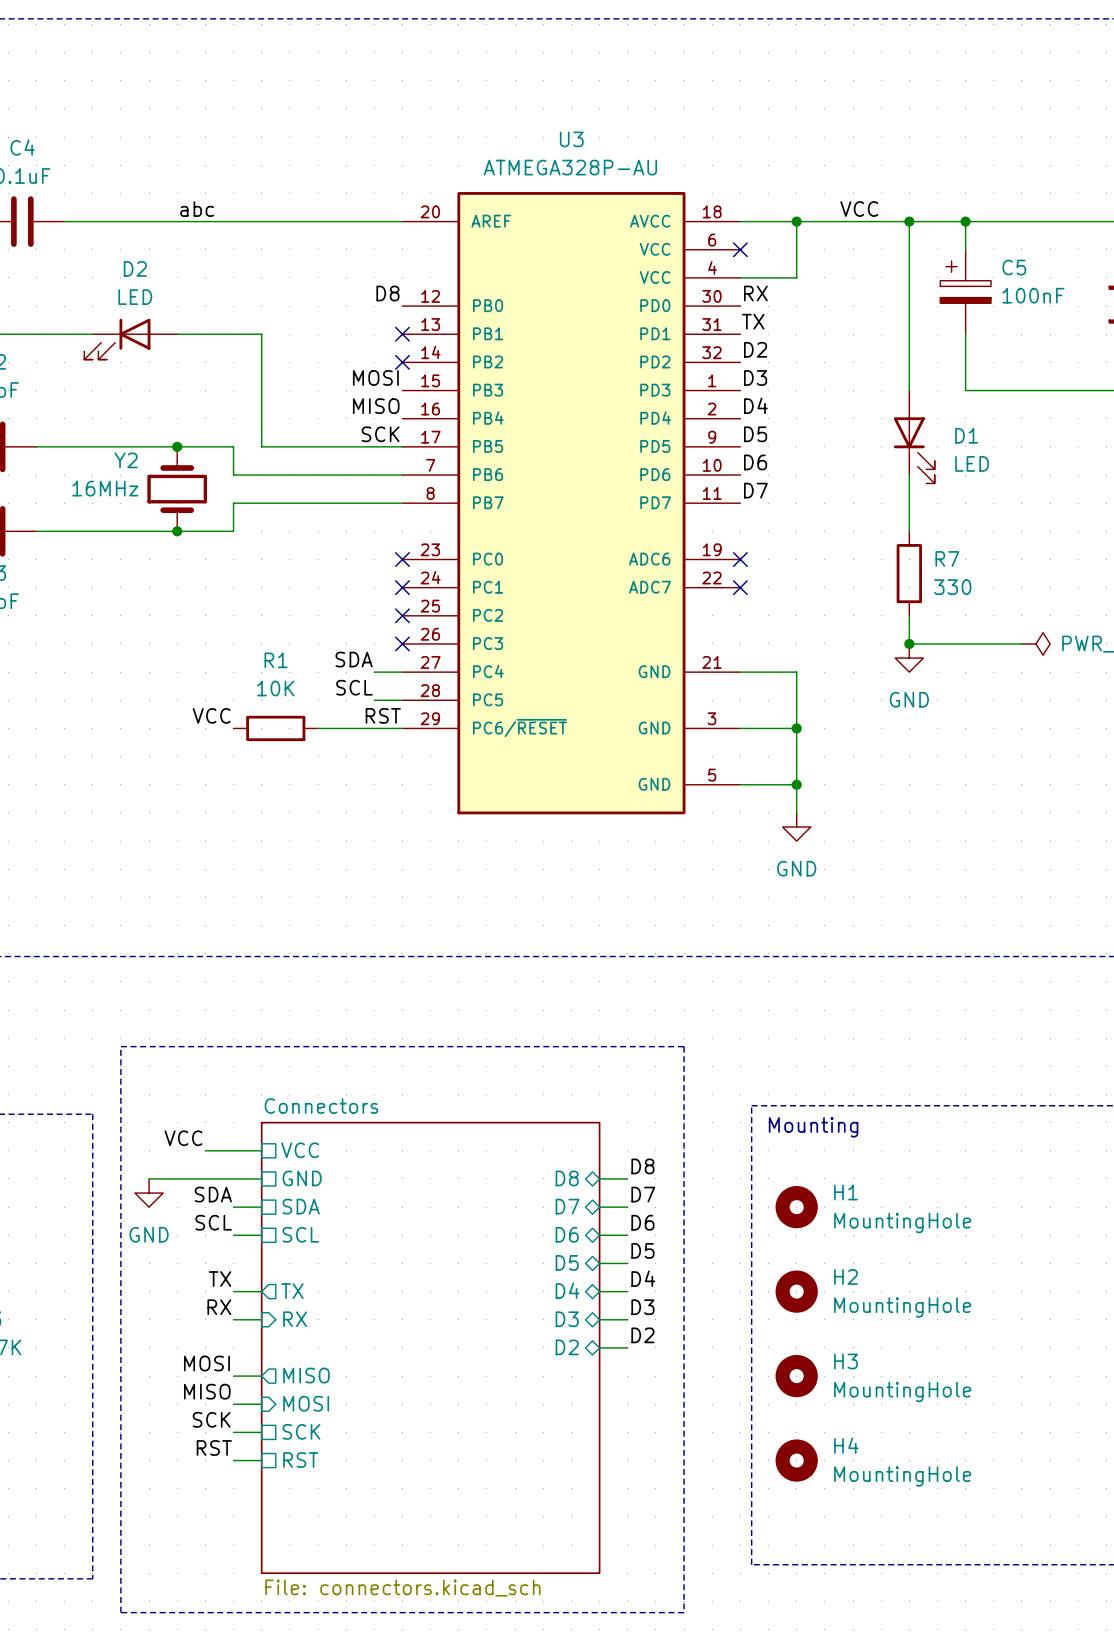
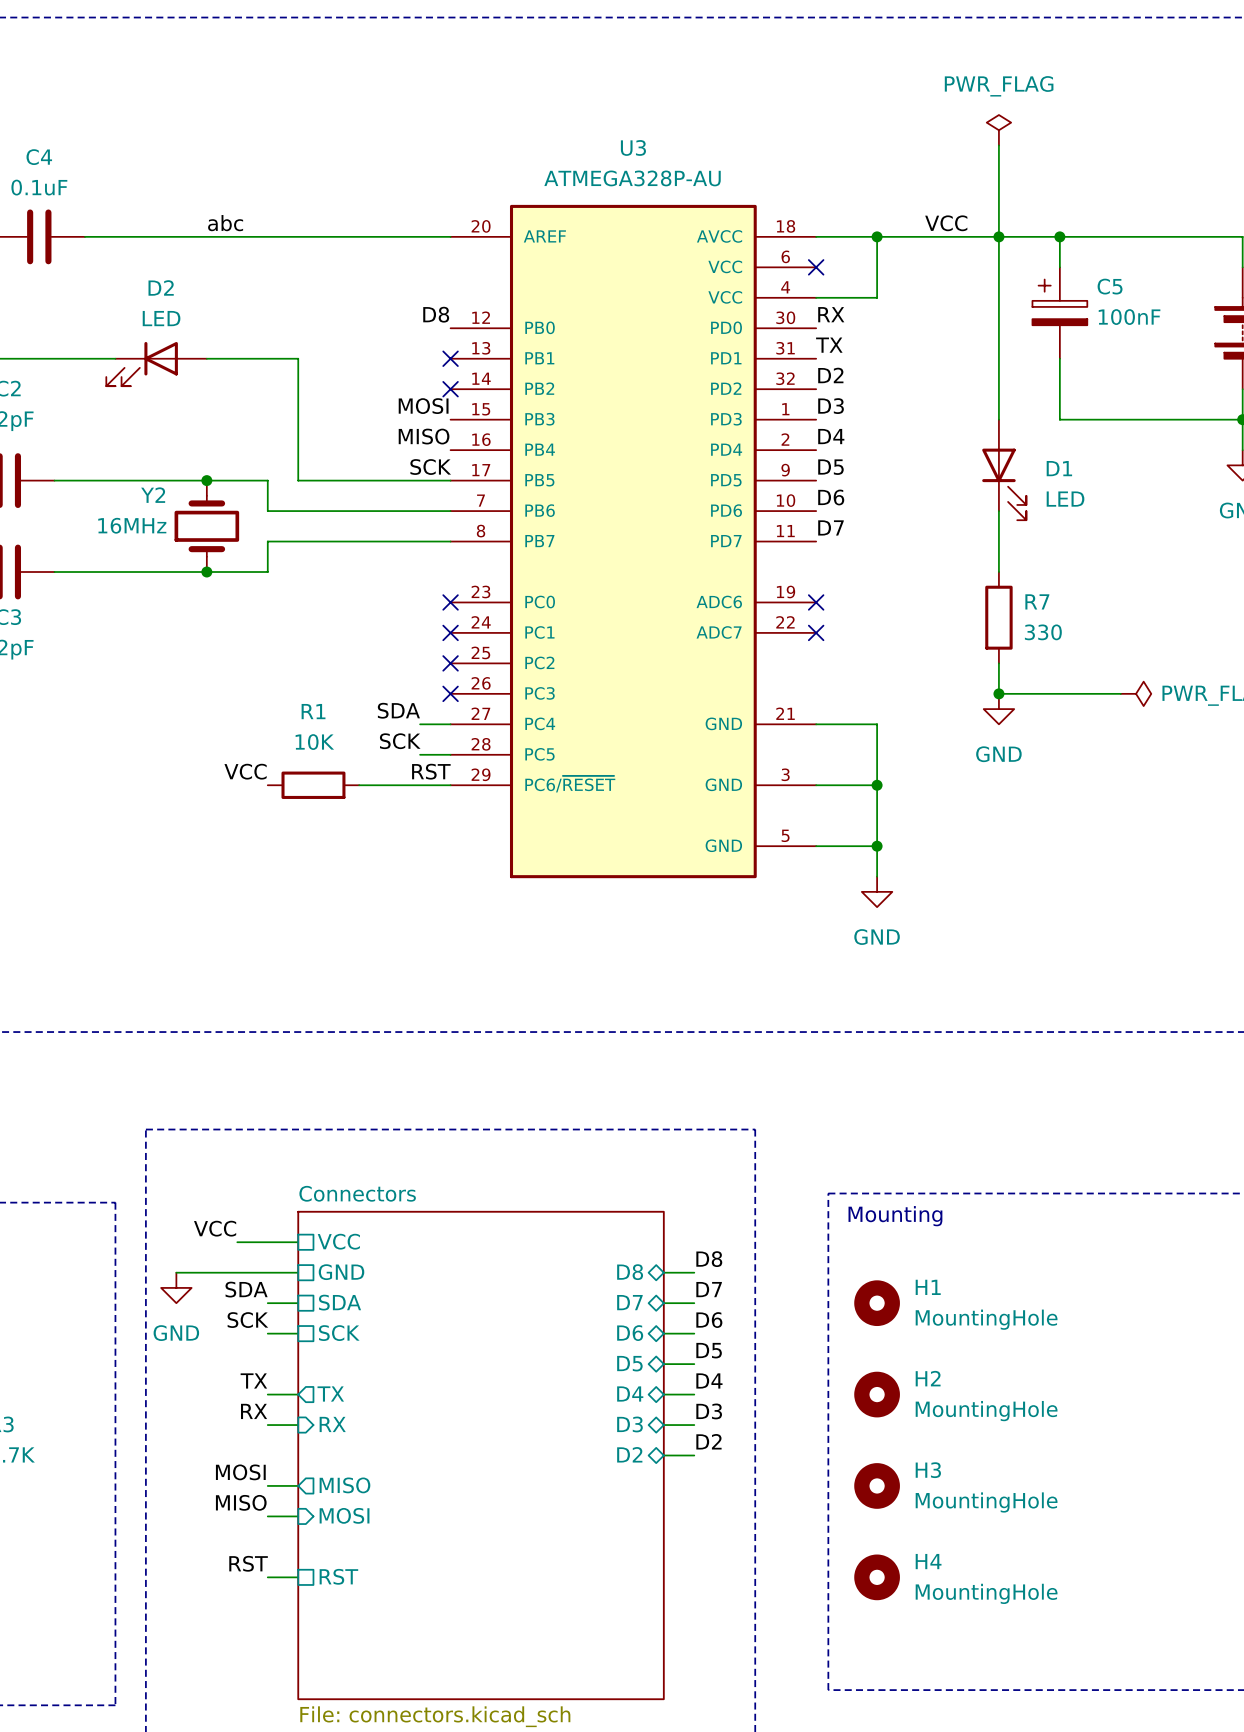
power symbol: none -> PWR_FLAG (998, 130)
wire: none -> (998, 145) (998, 236)
label: SCL (354, 687) -> SCK (400, 741)
label: SCL (213, 1222) -> SCK (247, 1320)
sheet pin: SCL (300, 1234) -> SCK (339, 1333)
label: SCK (211, 1419) -> none
sheet pin: SCK (301, 1431) -> none
wire: (233, 1432) (261, 1432) -> none

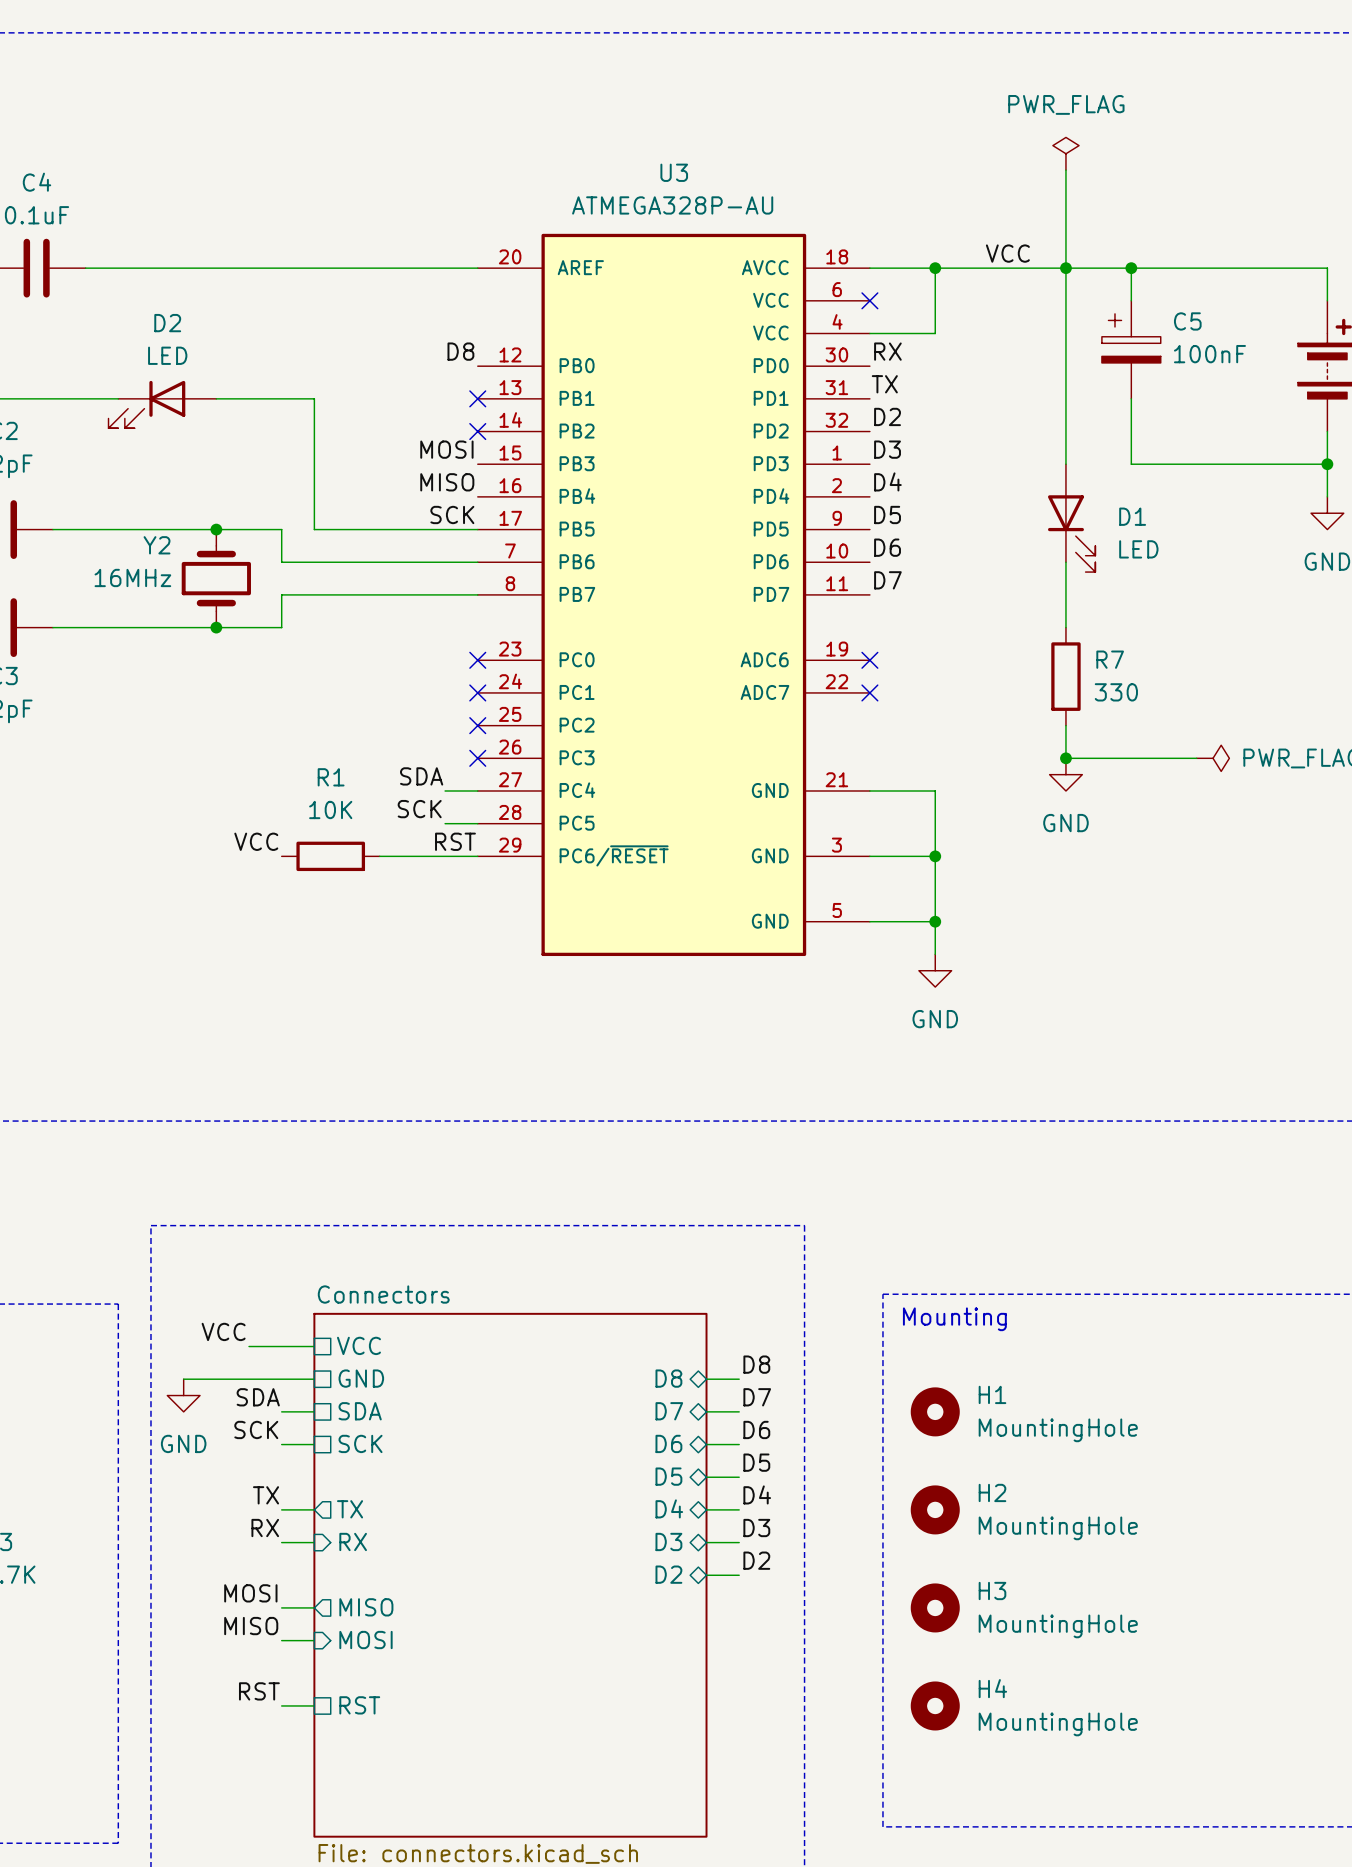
label: abc (225, 223) -> none

